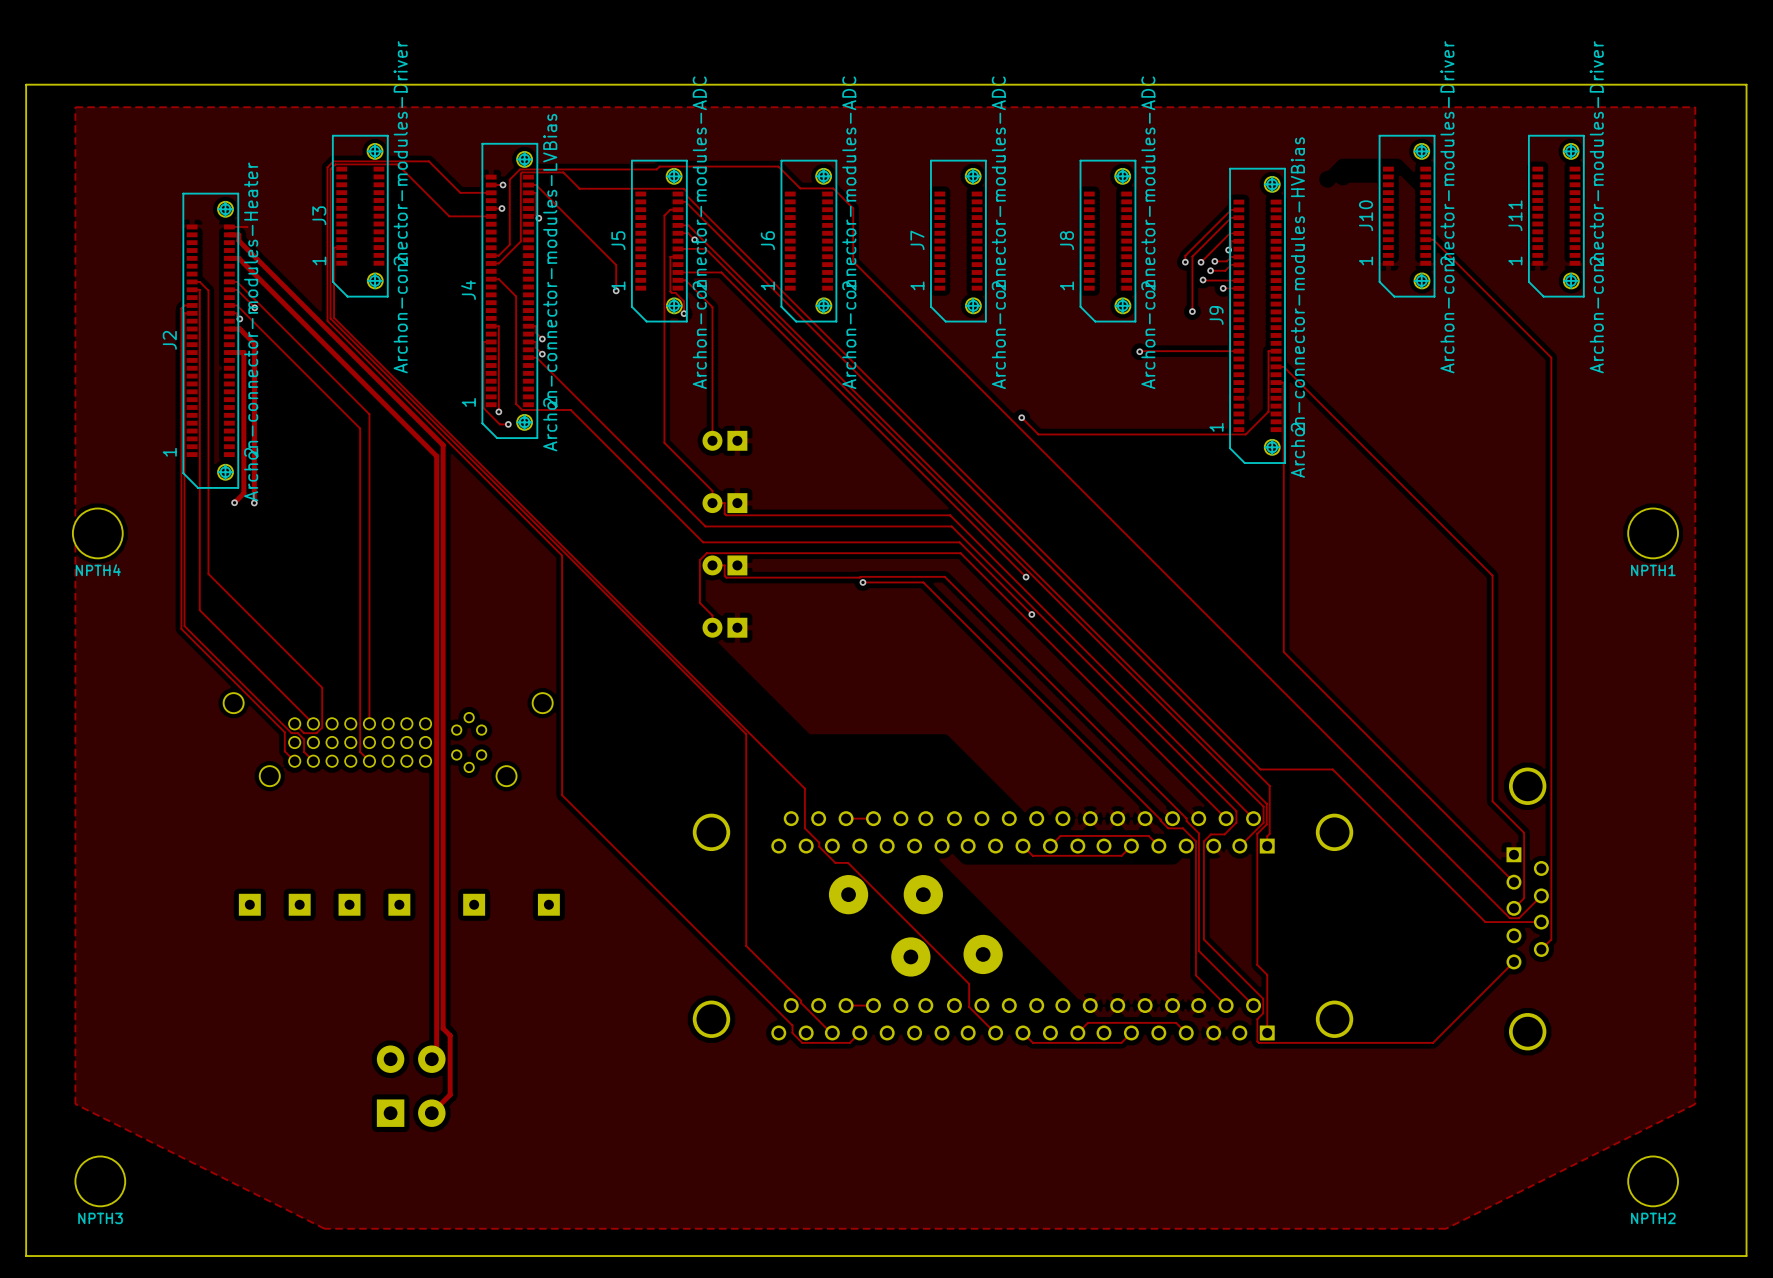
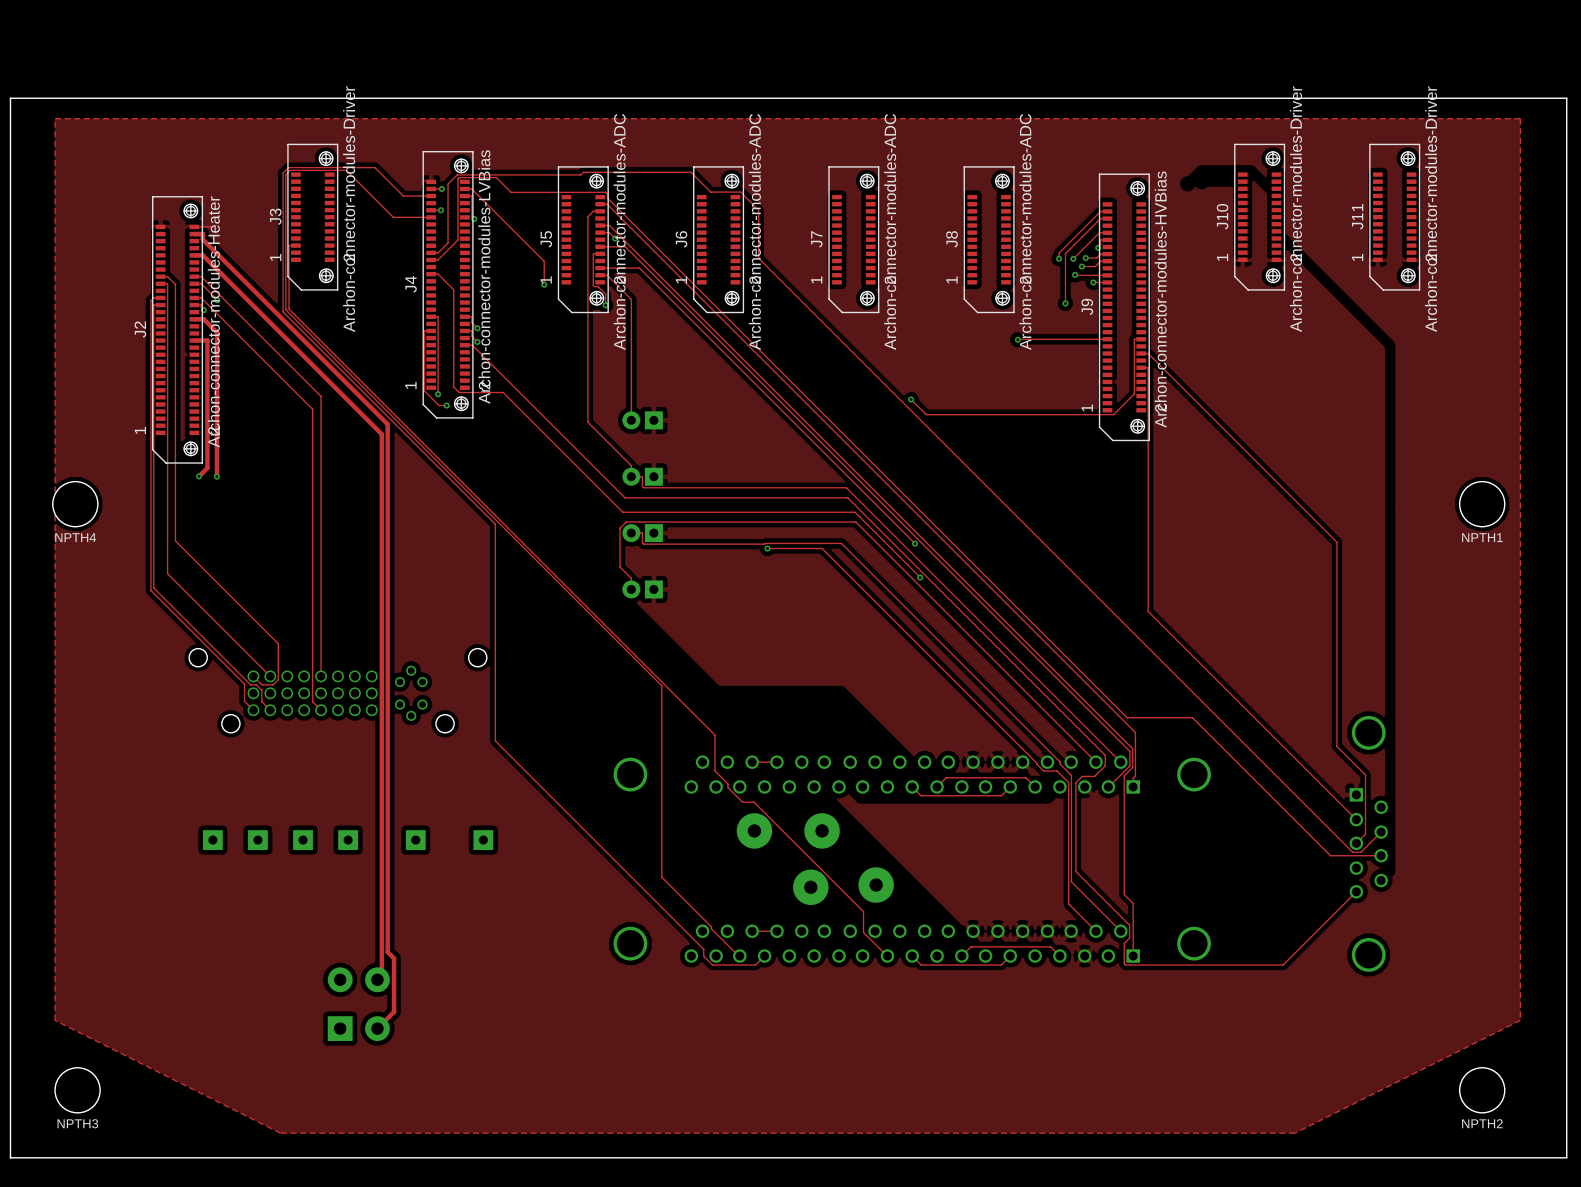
track: (1425, 239) (1433, 239) (1551, 357) (1551, 939) (1541, 949) -> none

